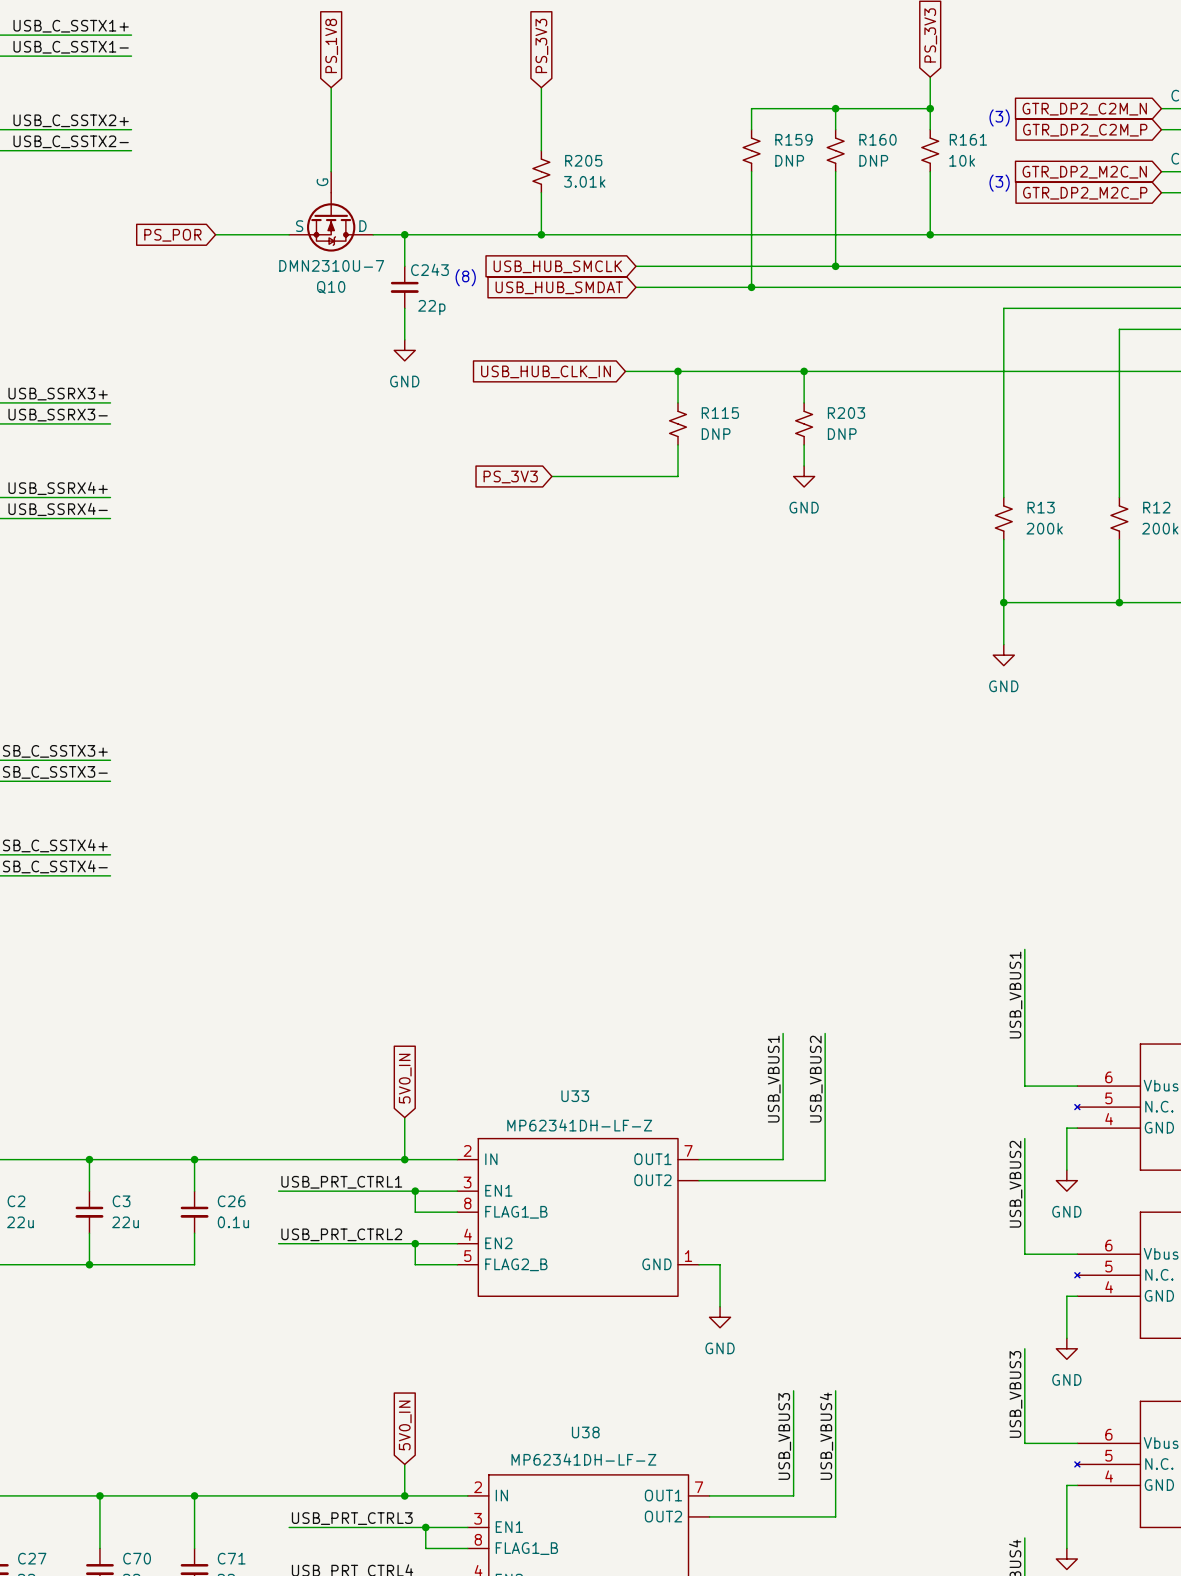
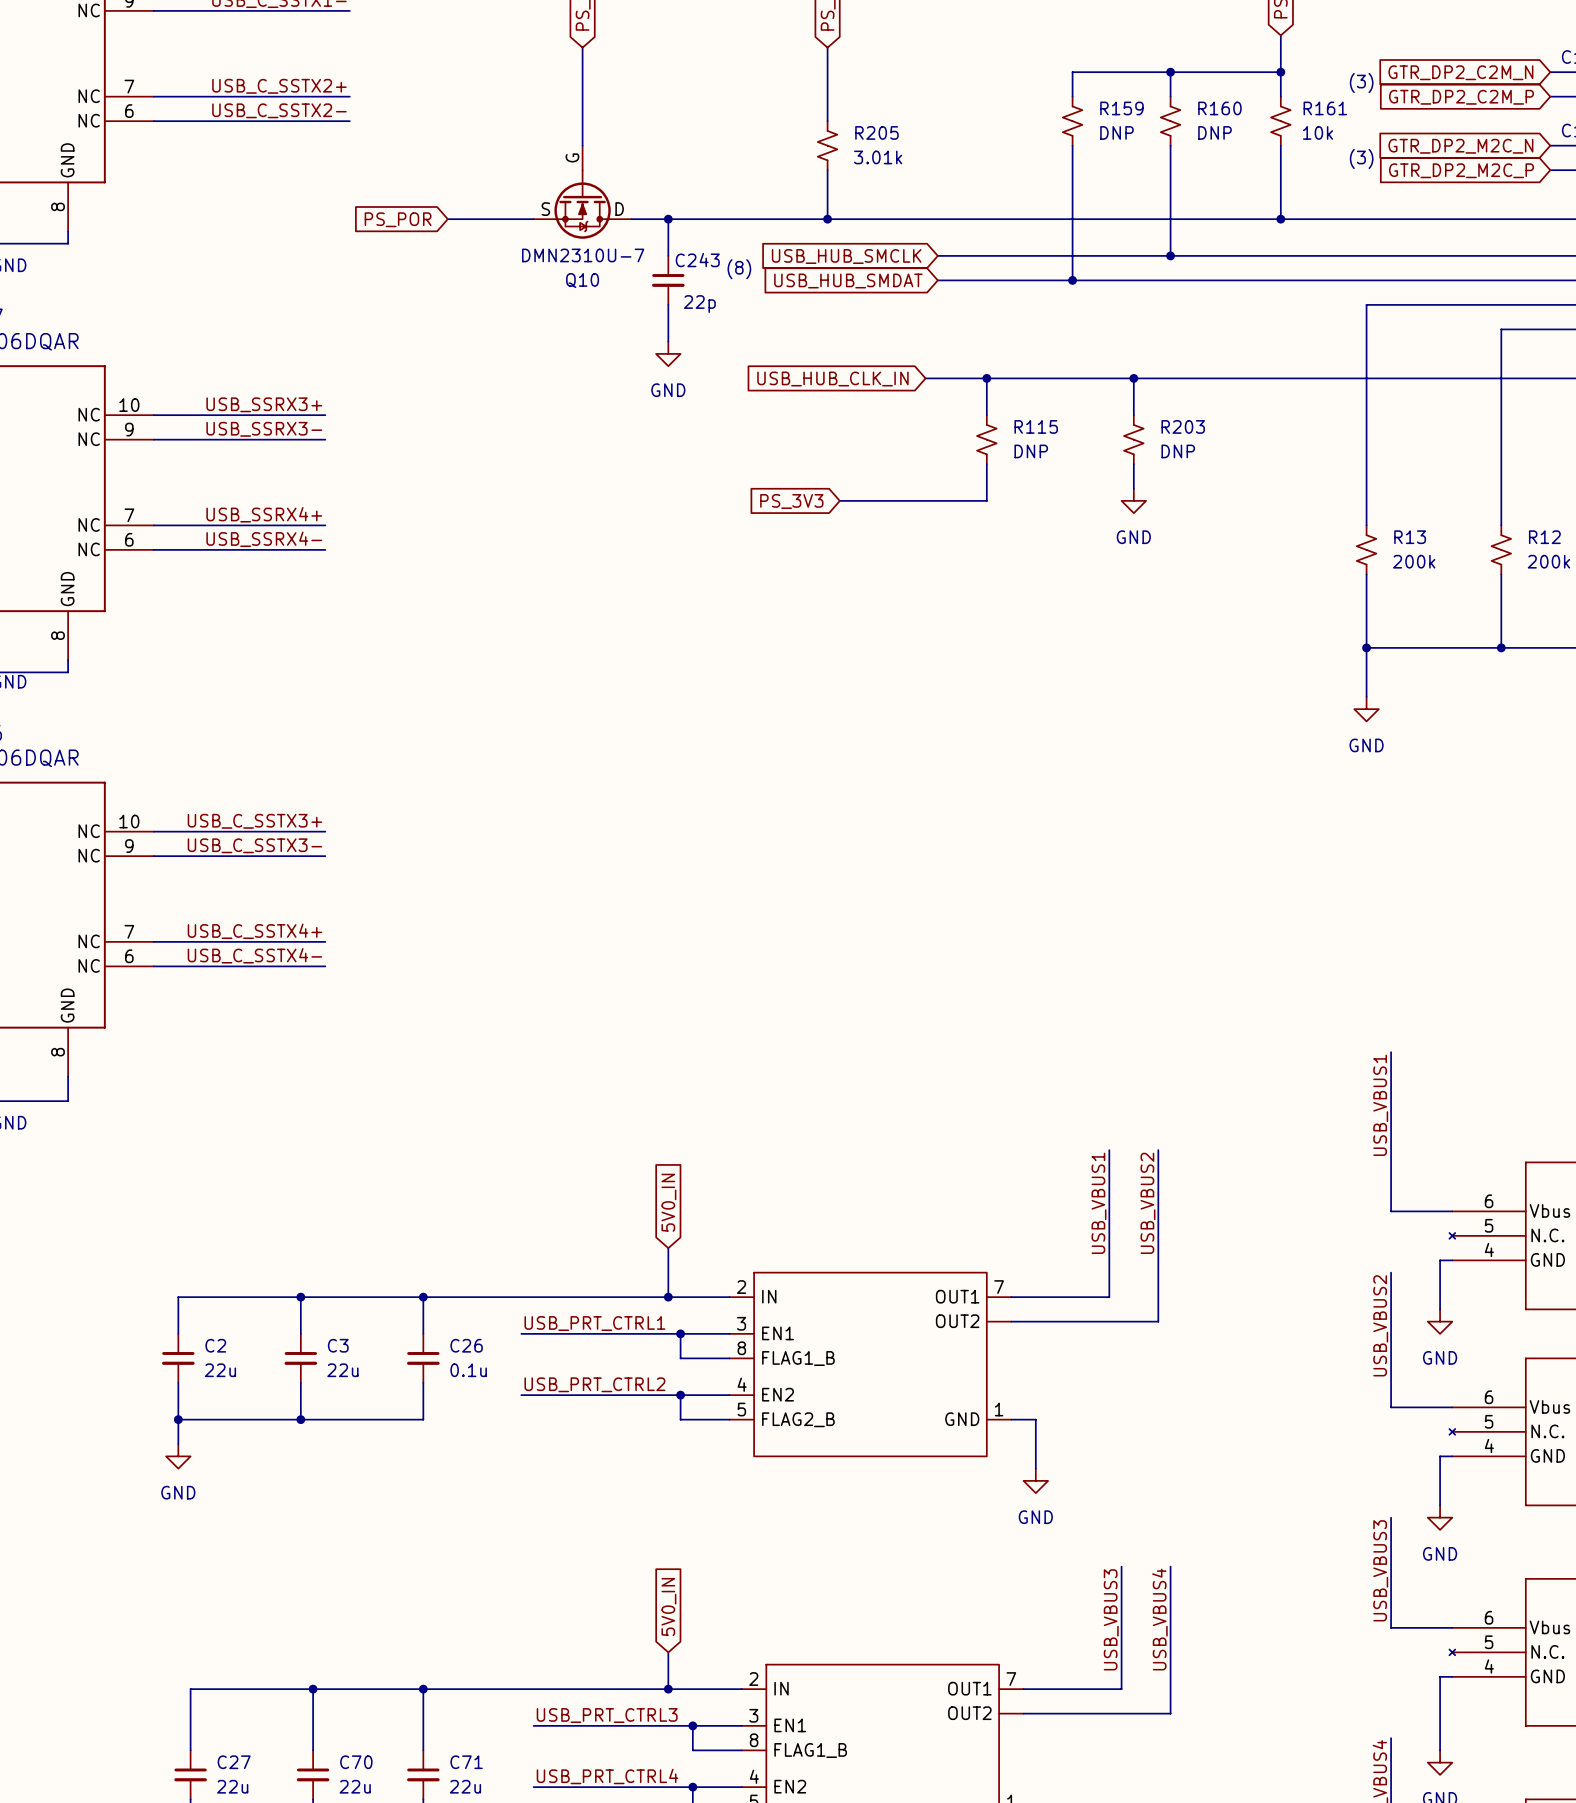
U33 name: U33 (575, 1096) -> none
U33 value: MP62341DH-LF-Z (579, 1125) -> none
U38 name: U38 (585, 1432) -> none
U38 value: MP62341DH-LF-Z (583, 1459) -> none

